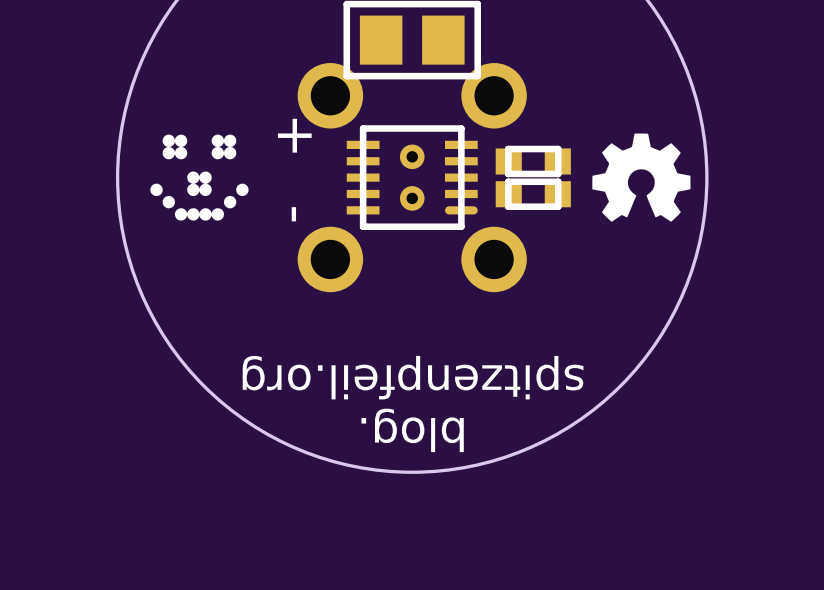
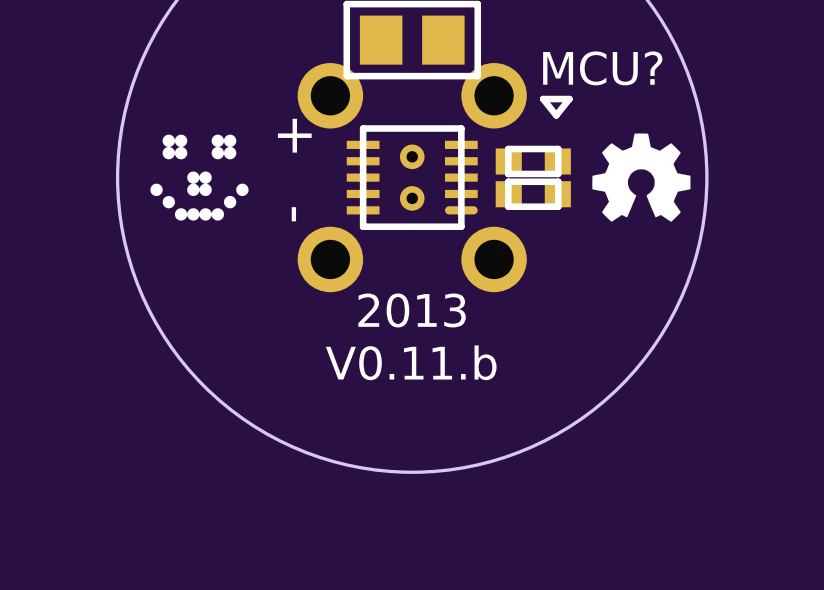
text: none -> MCU? (602, 68)
line: none -> (569, 99) (556, 115) (543, 99) (569, 99)
text: none -> 2013 (412, 310)
text: spitzenpfeil.org (413, 377) -> V0.11.b (411, 362)
text: blog. (412, 430) -> none

